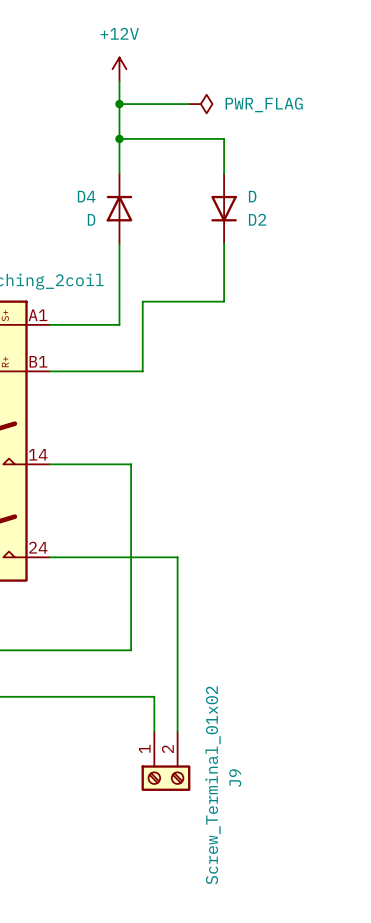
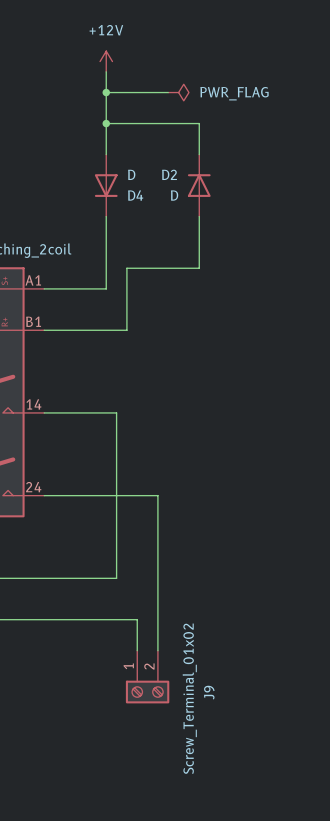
D4 rotation: 0° (119, 208) -> 180° (106, 185)
D2 rotation: 0° (224, 208) -> 180° (199, 185)

